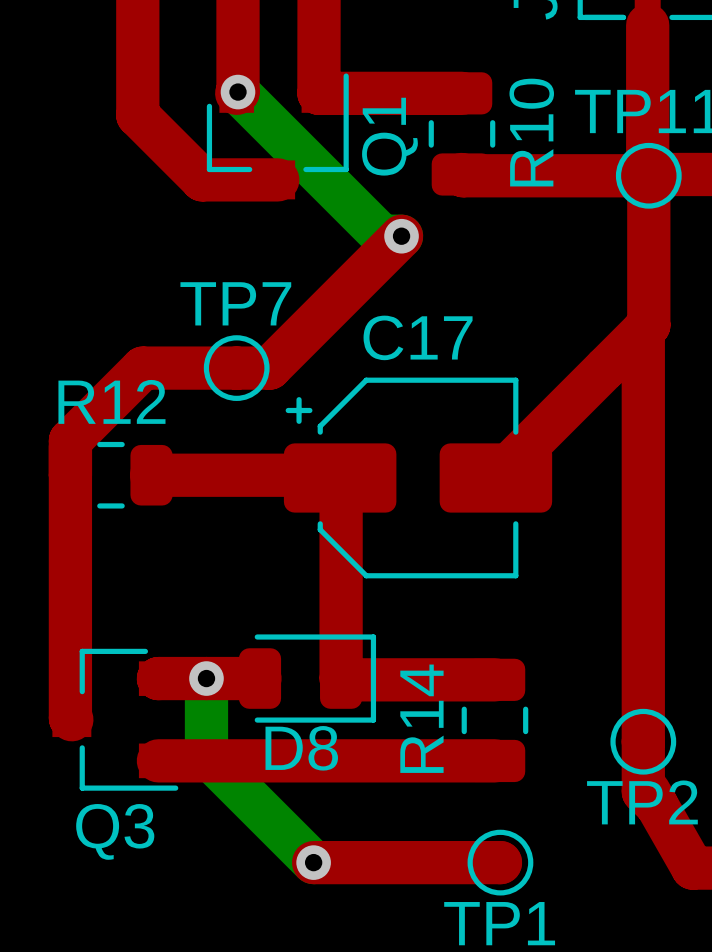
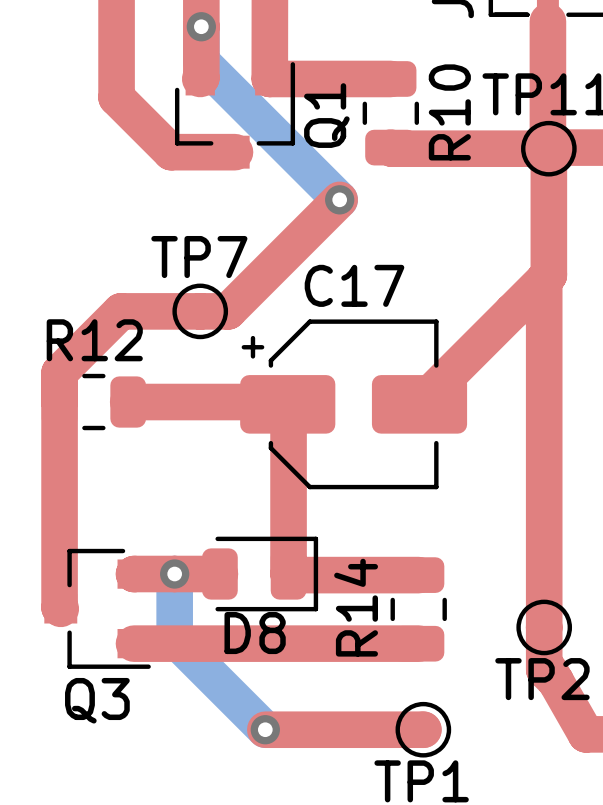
bottom track: (238, 92) (382, 236) (401, 236) -> (201, 26) (201, 61) (339, 199)
via position: (238, 92) -> (201, 26)

